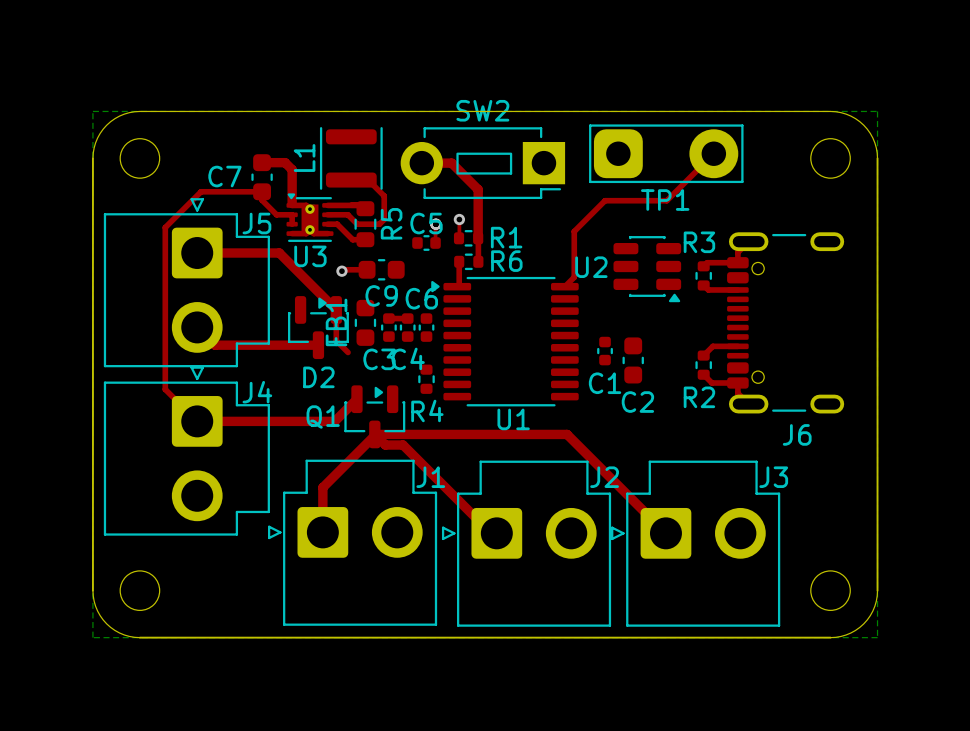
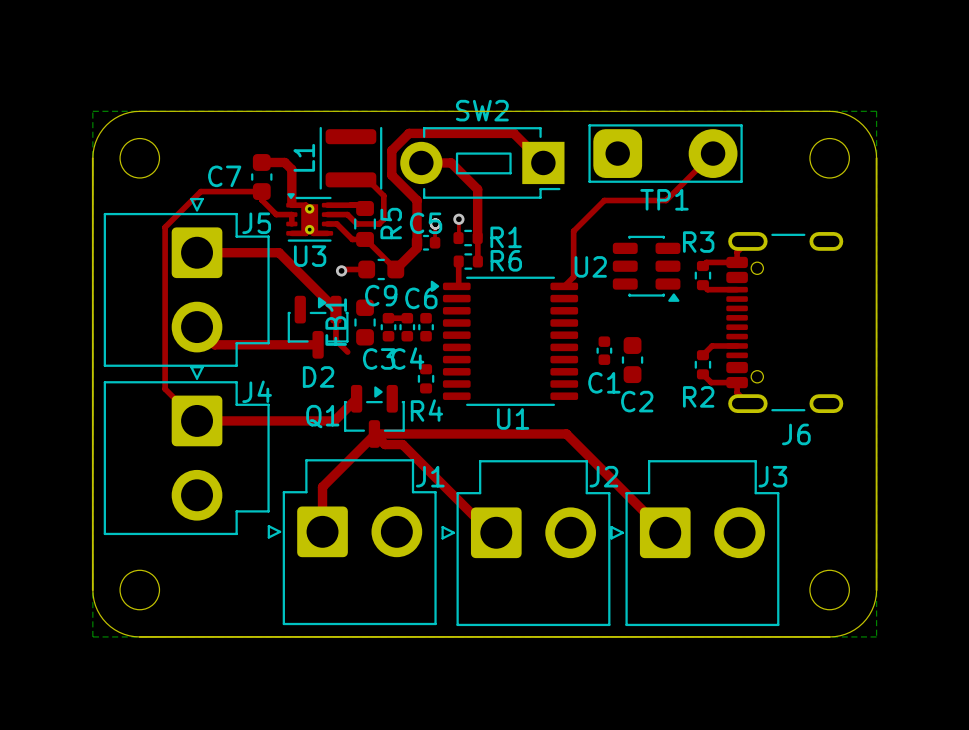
top track: none -> (543, 162) (513, 133) (409, 133) (391, 150) (391, 175) (417, 200) (417, 248) (395, 269) (365, 239)

